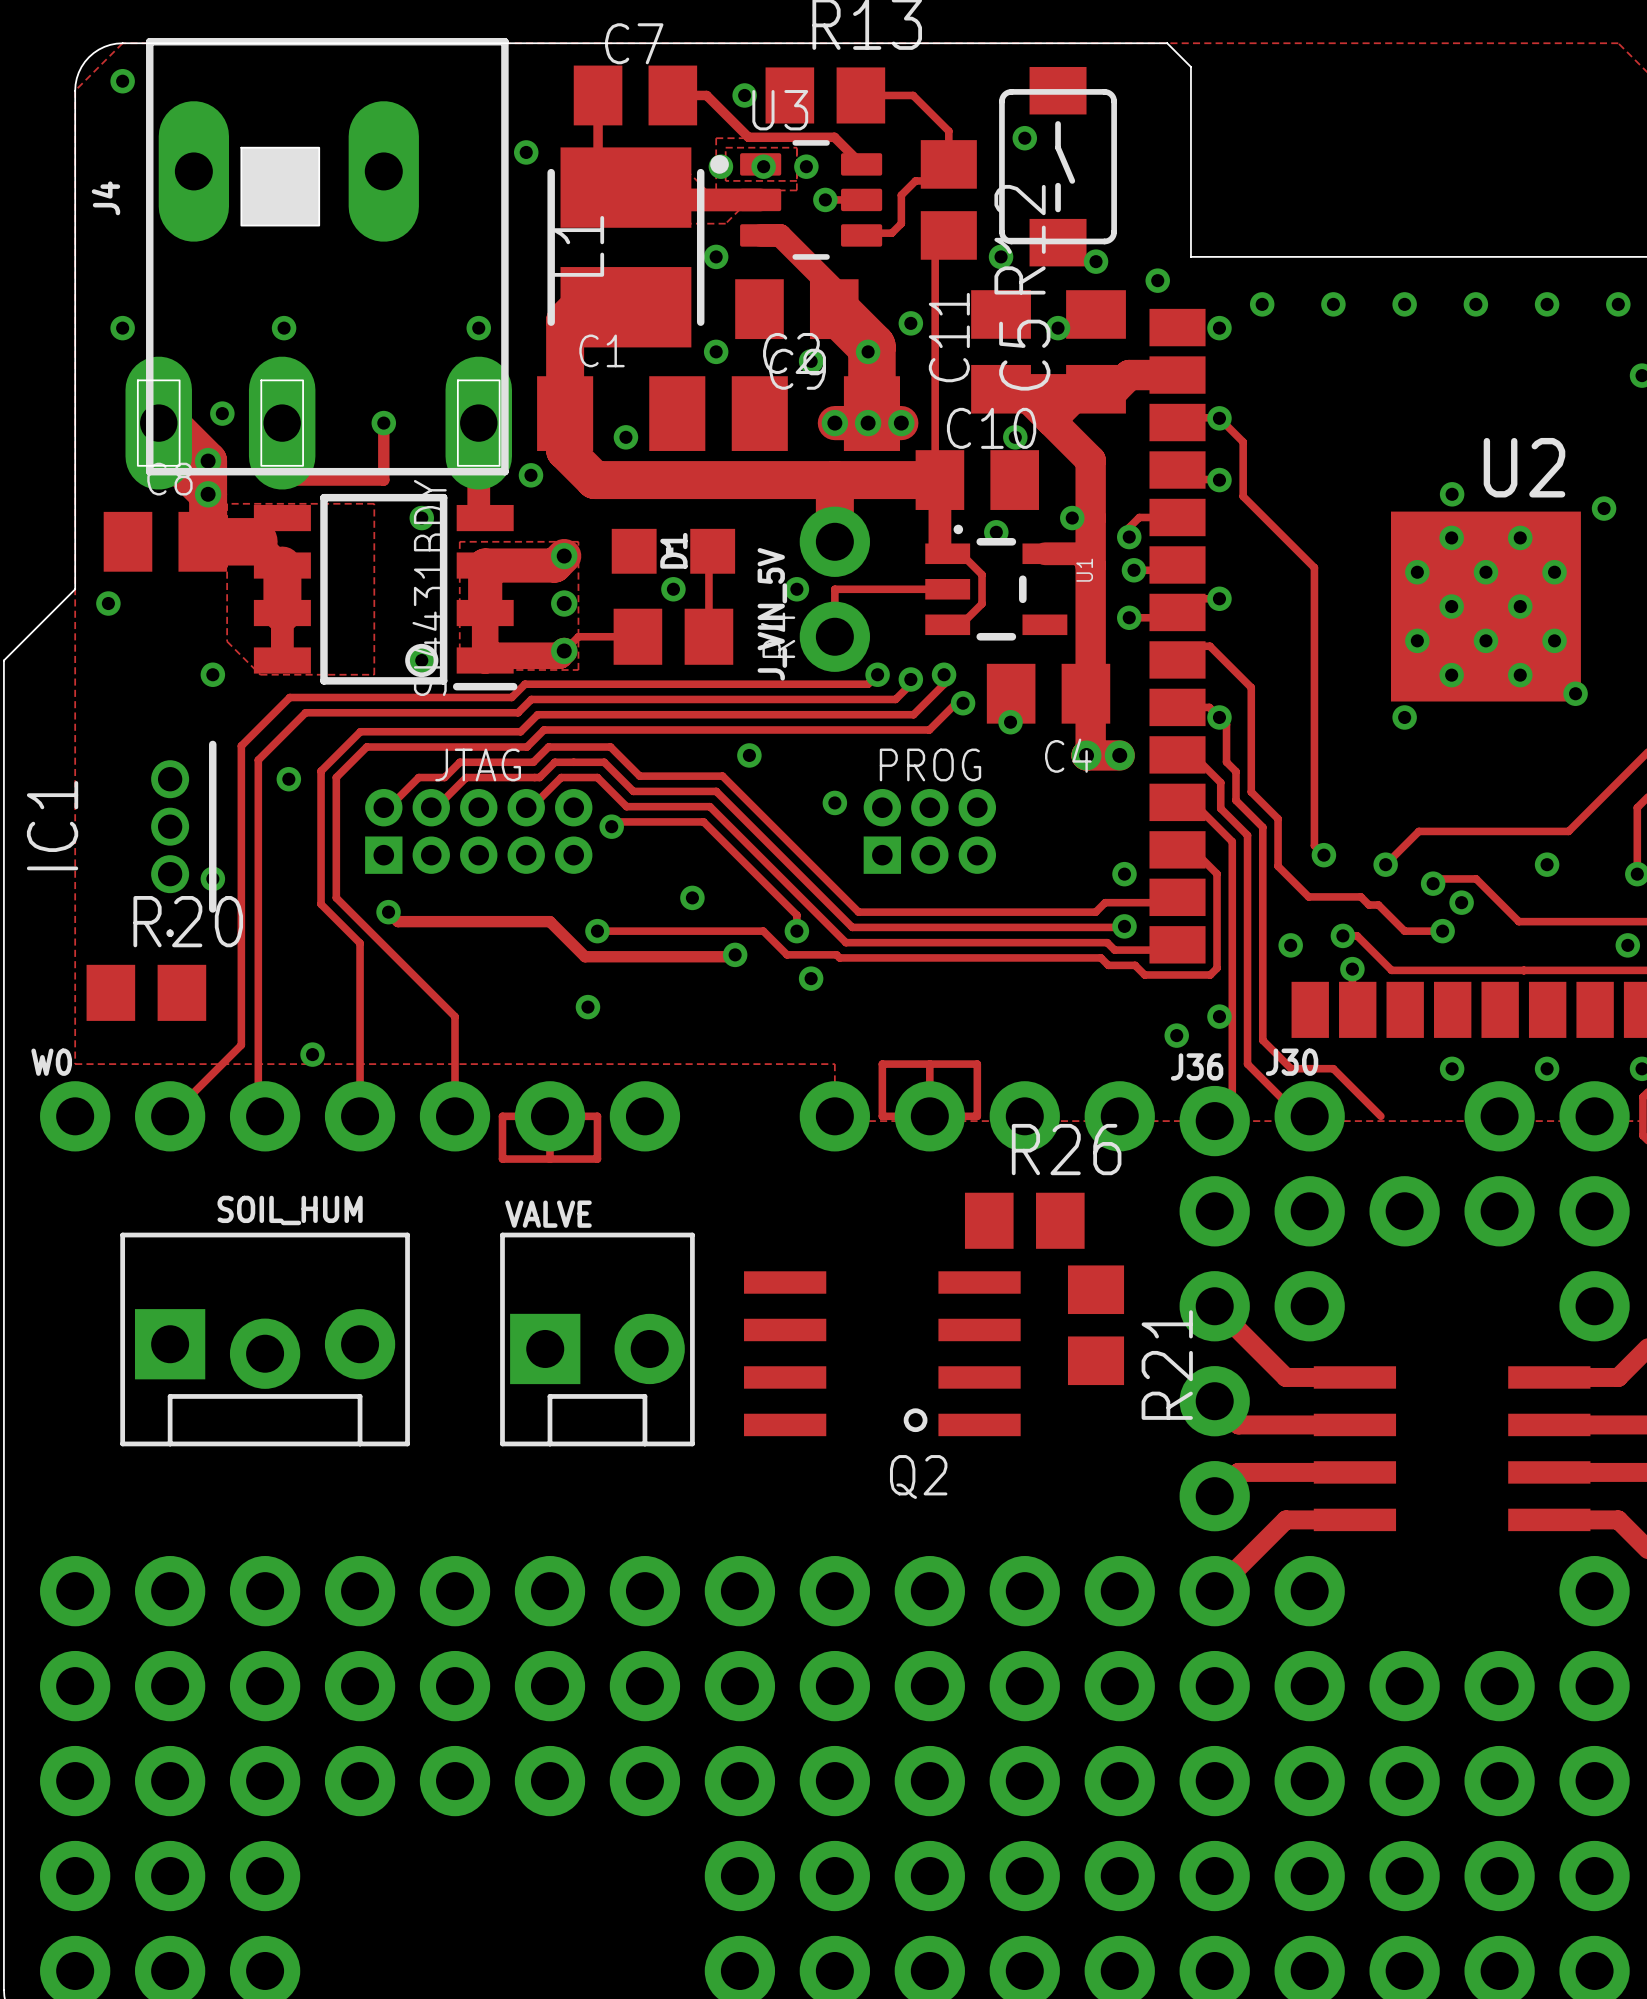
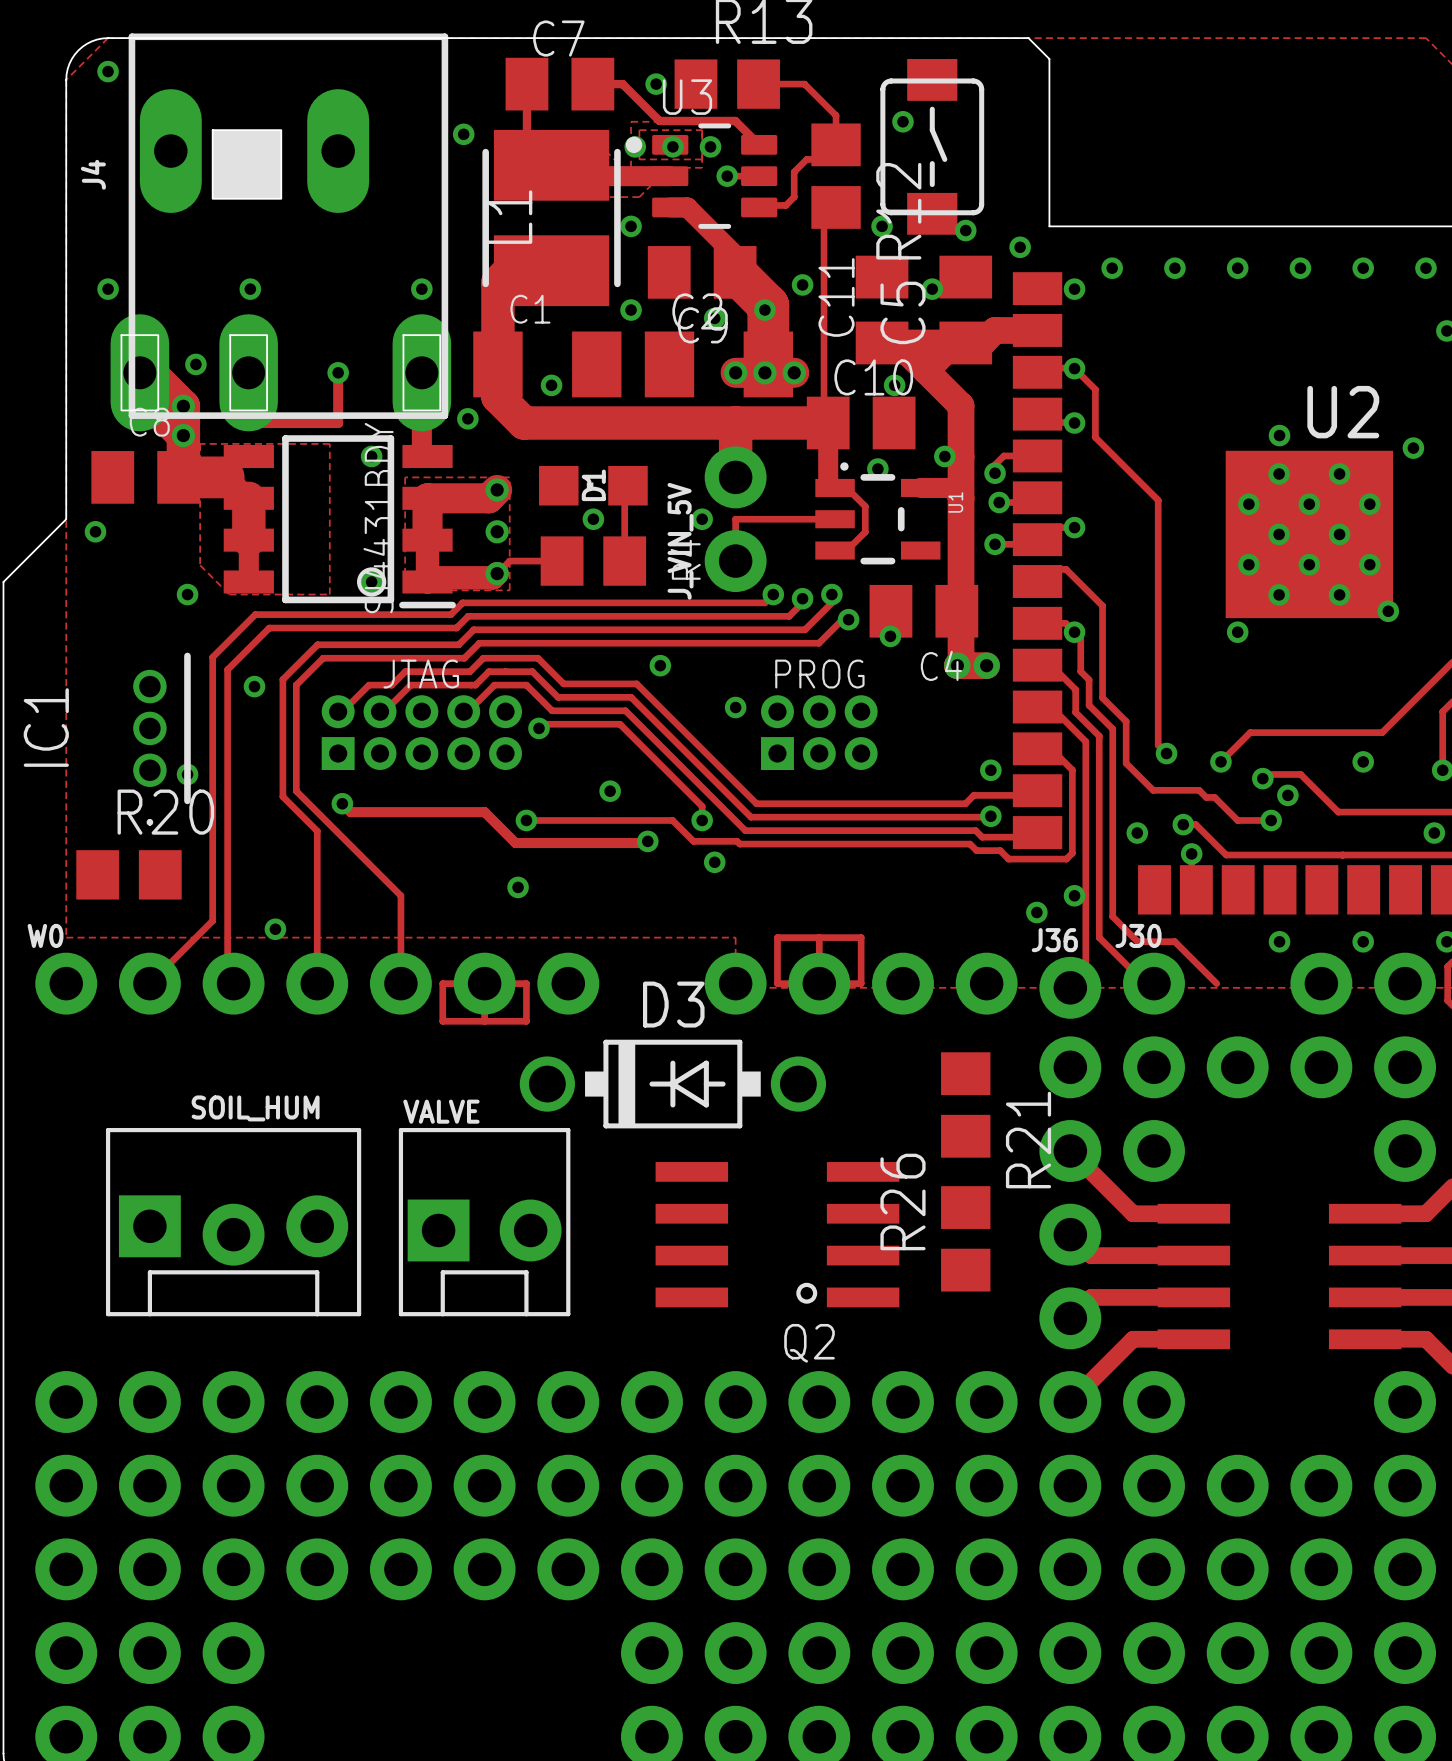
R26 name position: R26 (1066, 1149) -> R26 (902, 1201)
R26 rotation: 0° (1024, 1220) -> 90° clockwise (965, 1238)
R26 position: (1024, 1220) -> (965, 1238)
D3: none -> (672, 1084)
R21 position: (1096, 1325) -> (965, 1104)
SOIL_HUM position: (265, 1339) -> (233, 1222)
VALVE position: (597, 1339) -> (484, 1222)
Q2 position: (882, 1353) -> (777, 1234)

